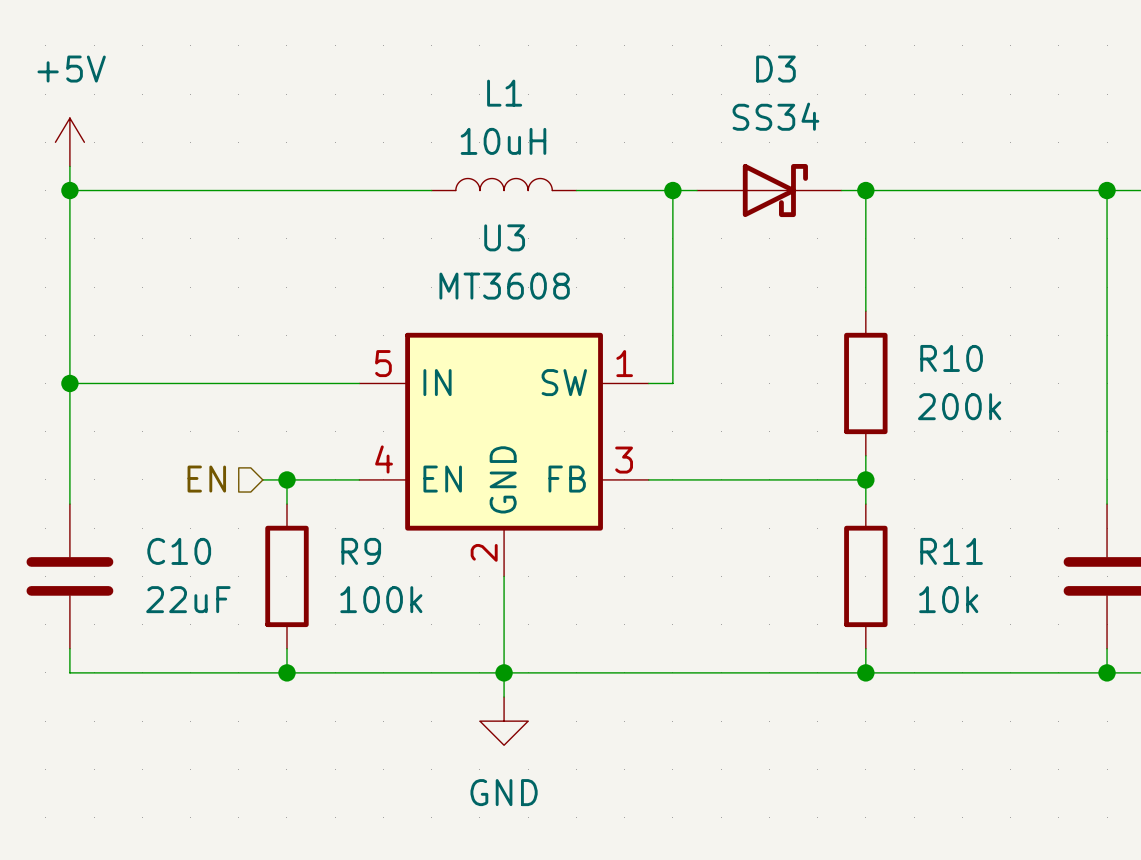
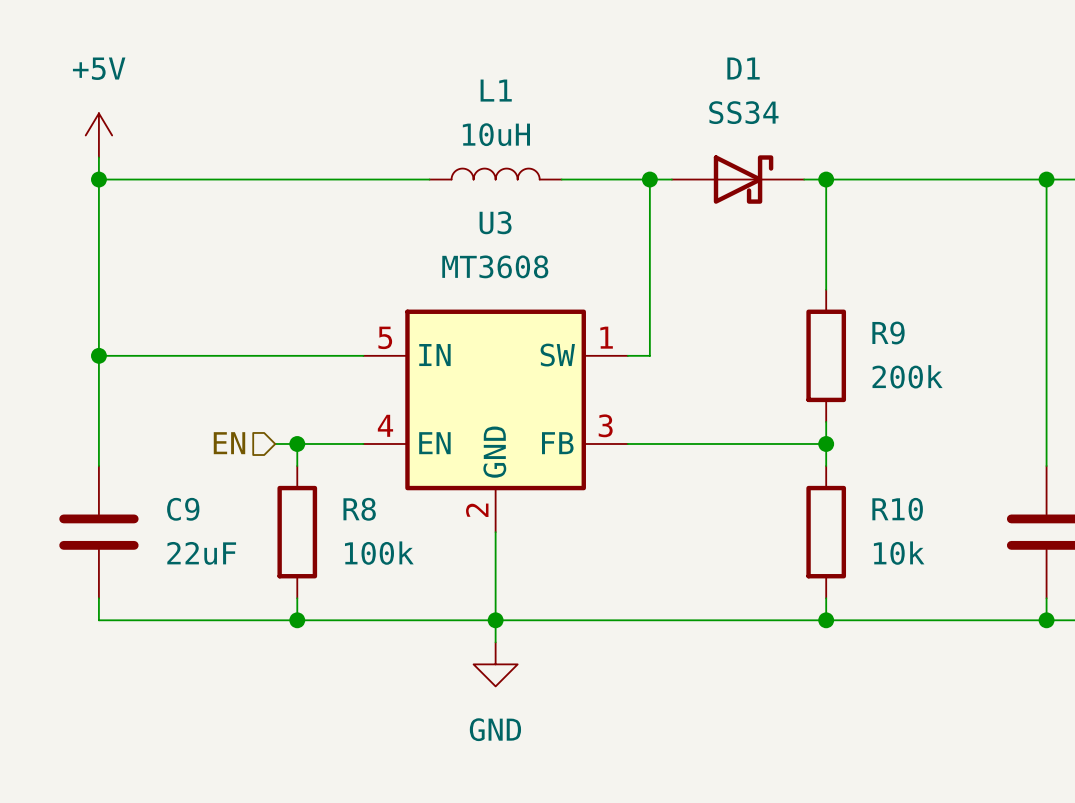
D3 name: D3 (775, 69) -> D1 (743, 68)
R10 name: R10 (951, 358) -> R9 (888, 332)
C10 name: C10 (179, 551) -> C9 (183, 509)
R9 name: R9 (361, 551) -> R8 (359, 509)
R11 name: R11 (951, 551) -> R10 (897, 509)

